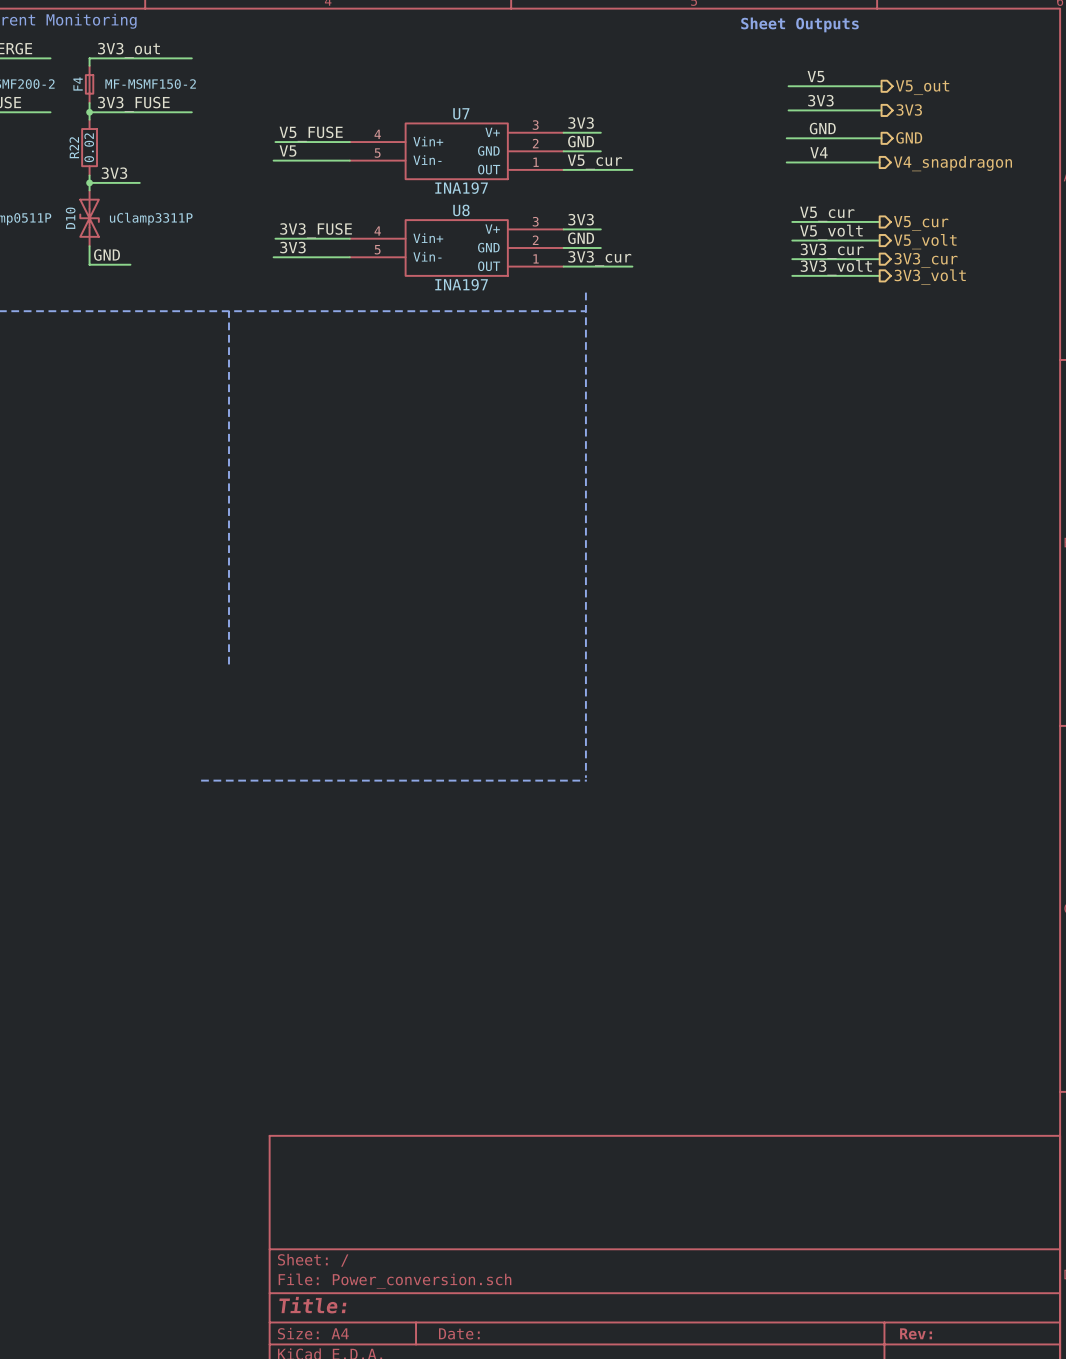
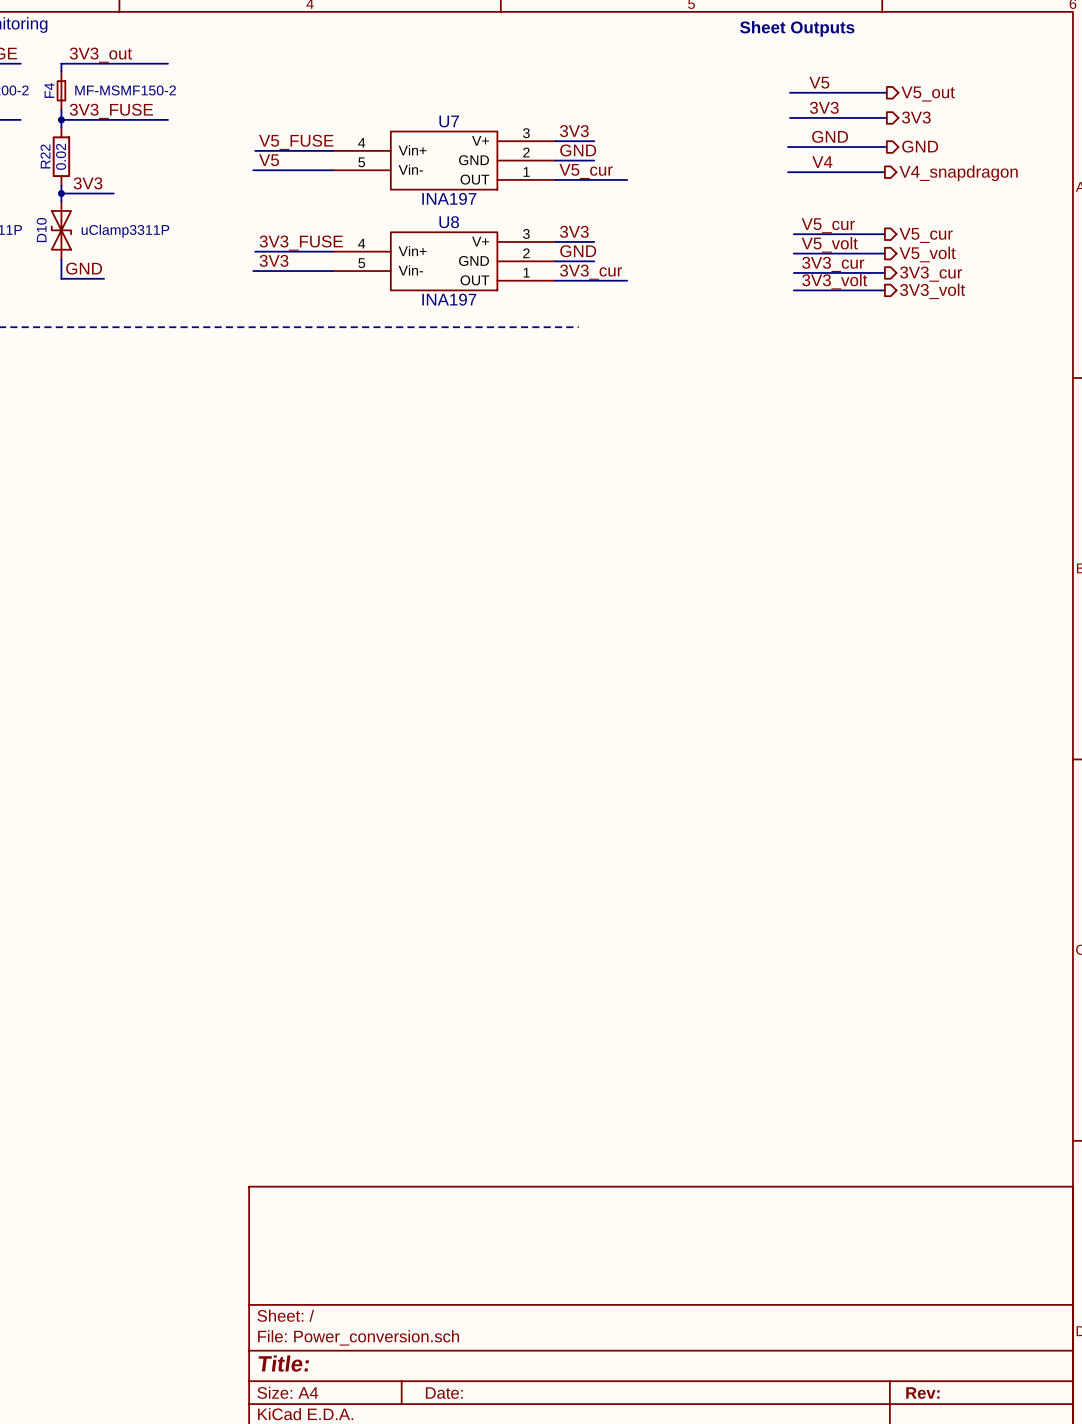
line: (585, 292) (585, 777) -> none
line: (229, 311) (229, 664) -> none
line: (201, 780) (586, 780) -> none

